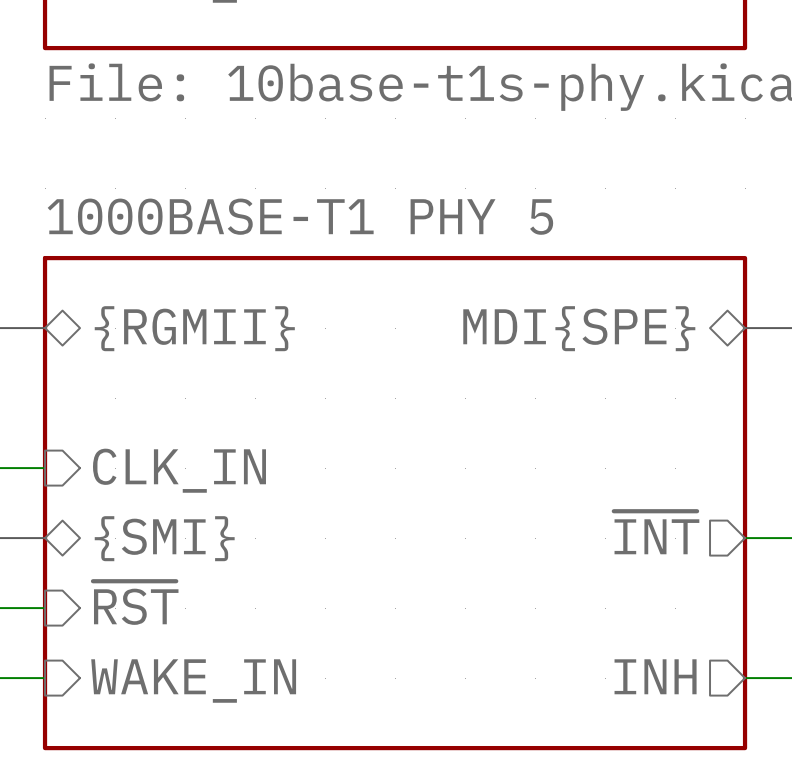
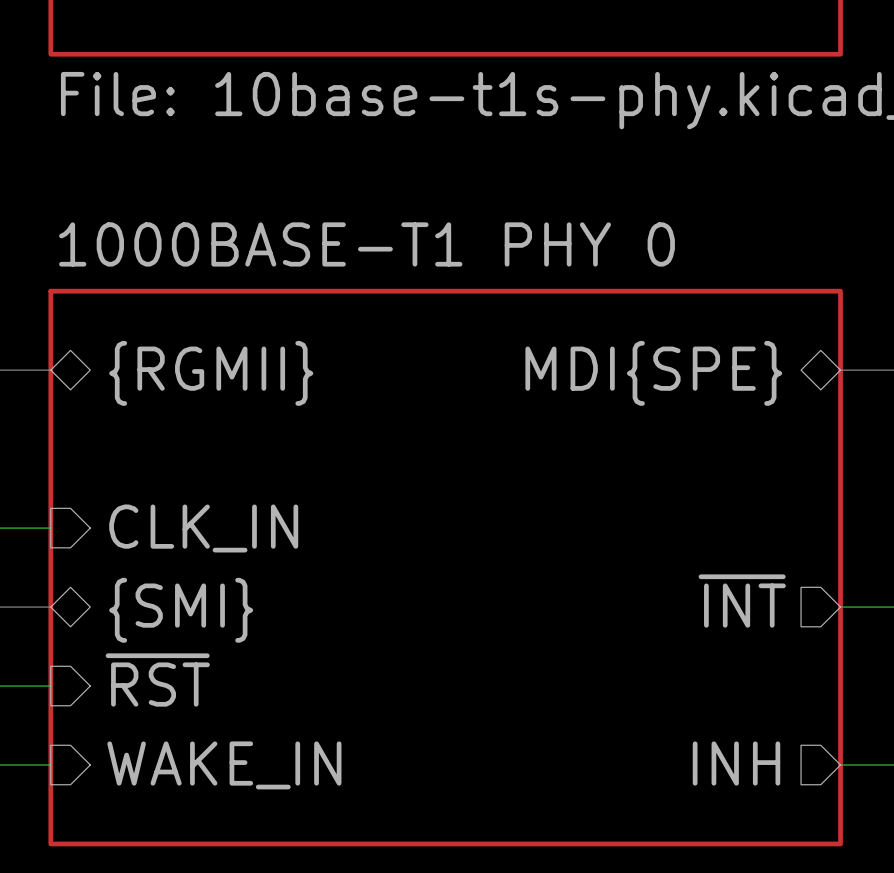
sheet 1000BASE-T1 PHY 5 name: 1000BASE-T1 PHY 5 (300, 216) -> 1000BASE-T1 PHY 0 (366, 244)

